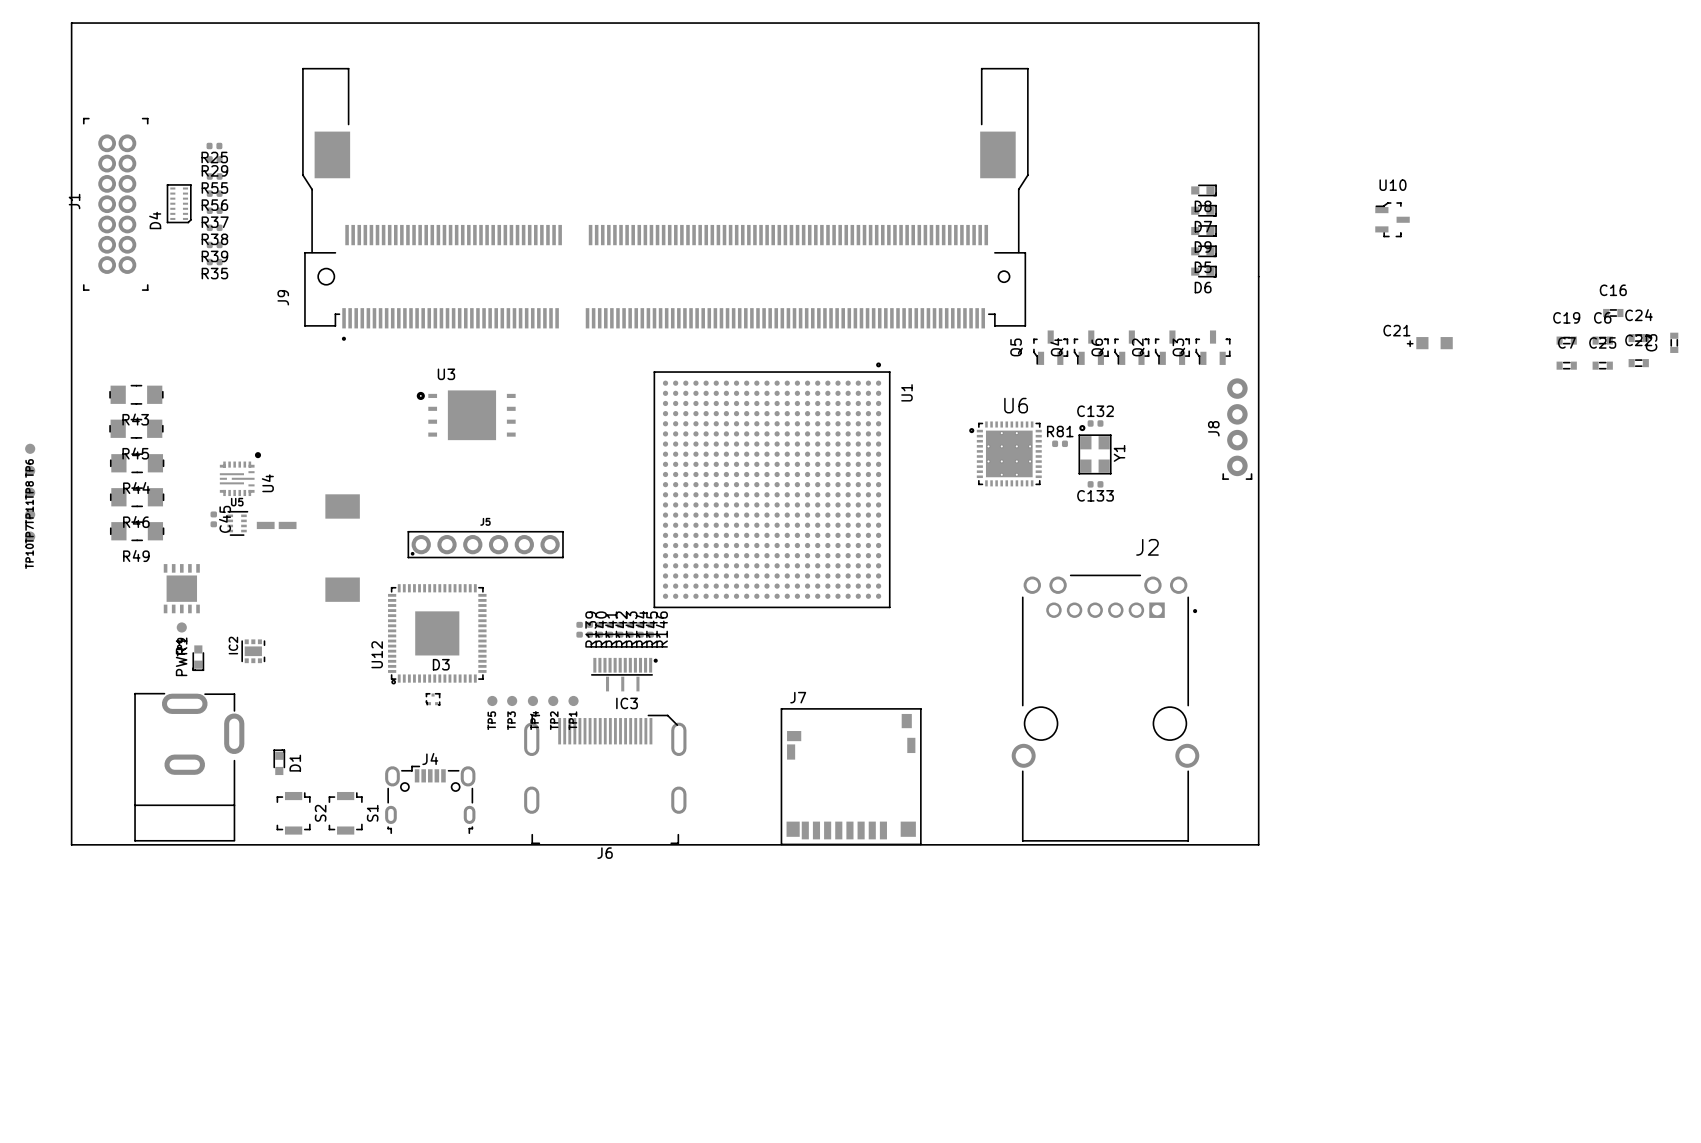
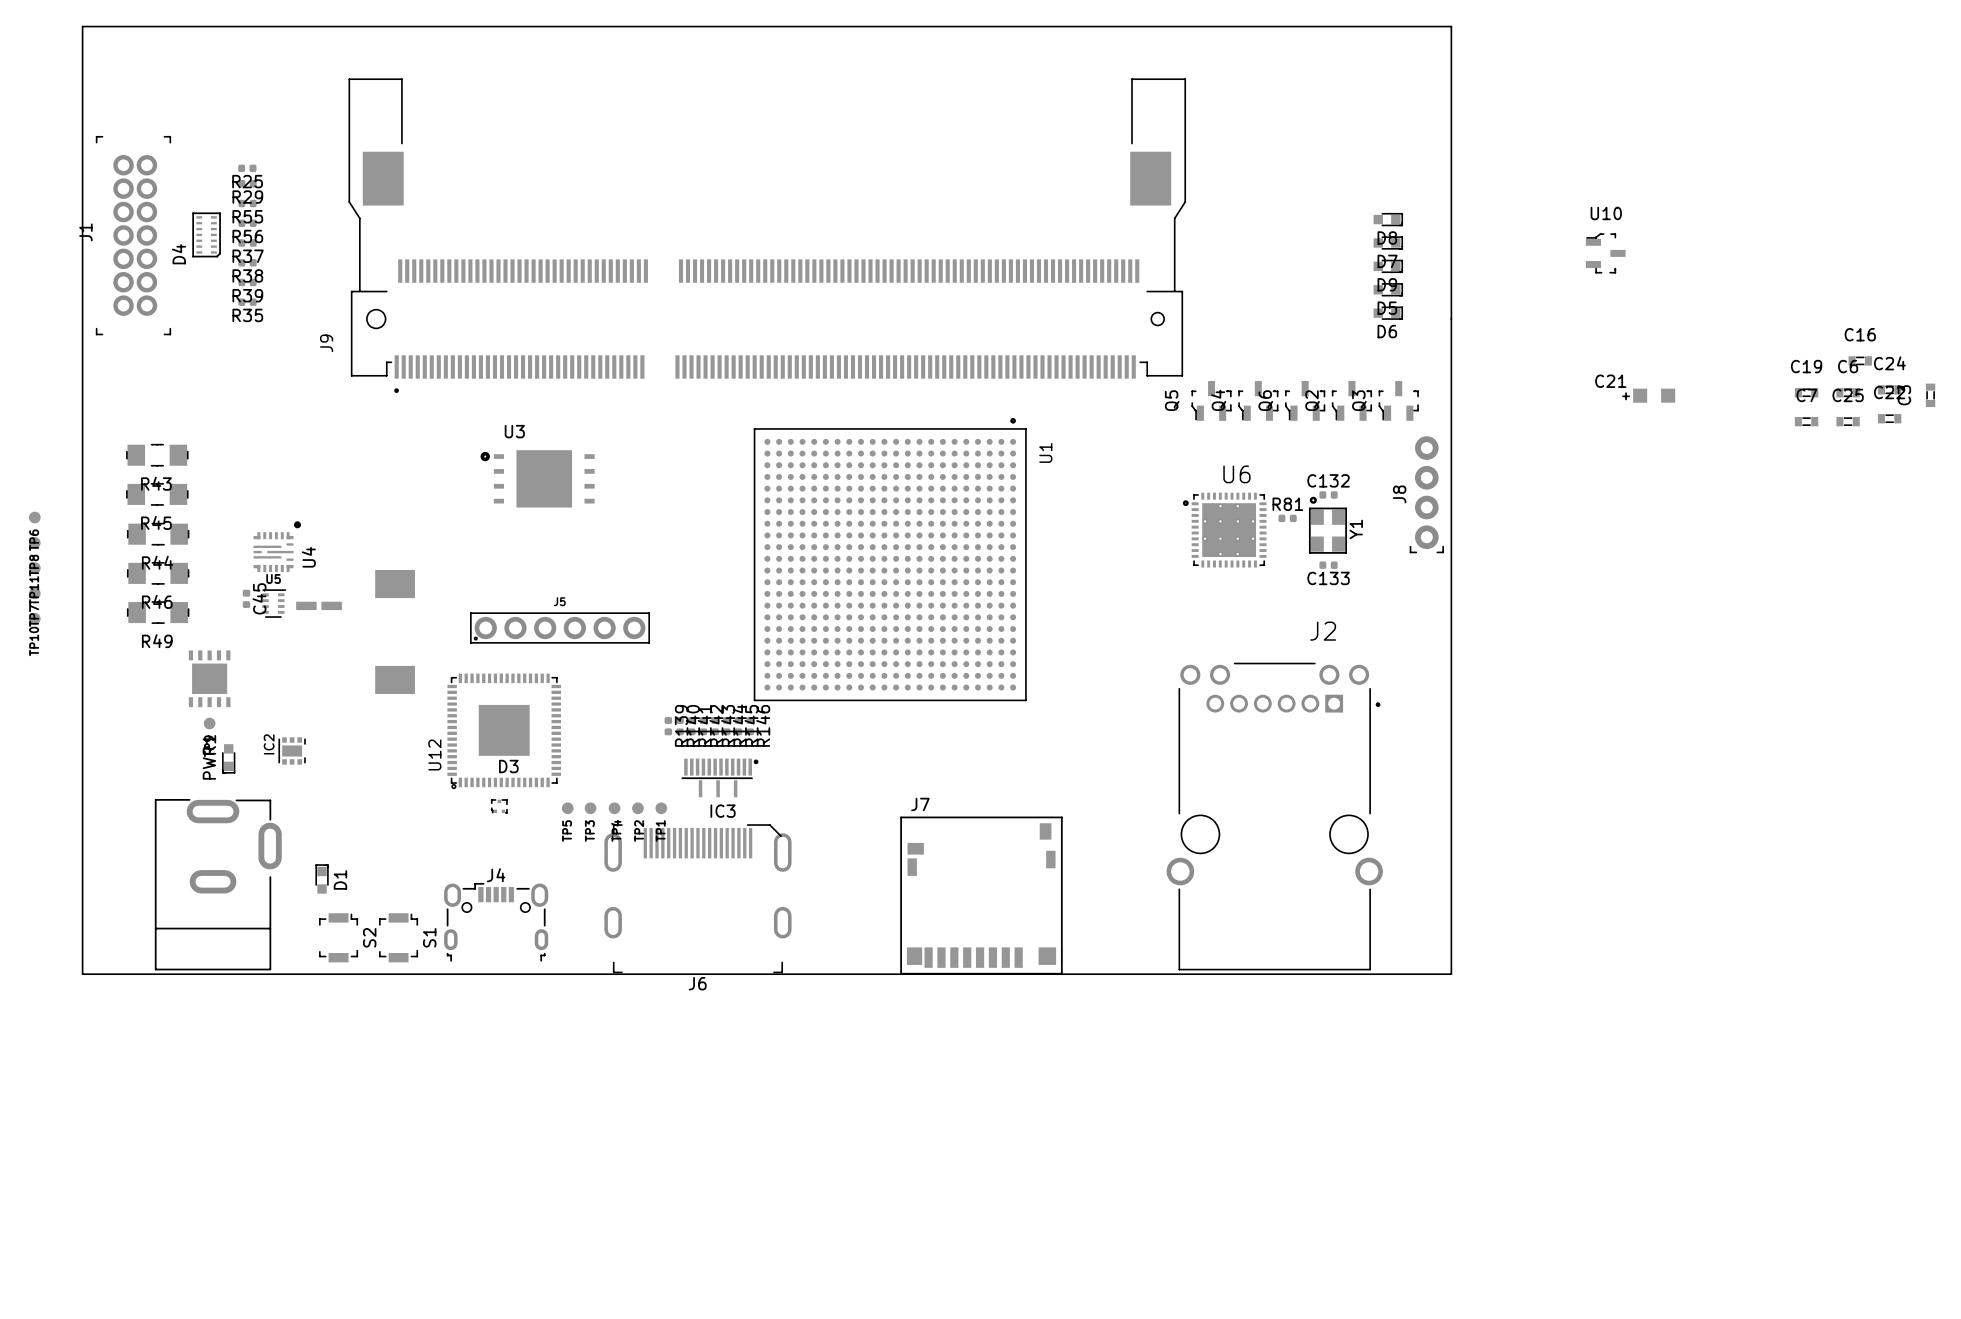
C132 position: (1095, 423) -> (1328, 494)
R81 position: (1060, 443) -> (1287, 518)
Y1 position: (1095, 449) -> (1327, 525)
U6 position: (1005, 453) -> (1224, 530)
C133 position: (1095, 484) -> (1328, 565)

